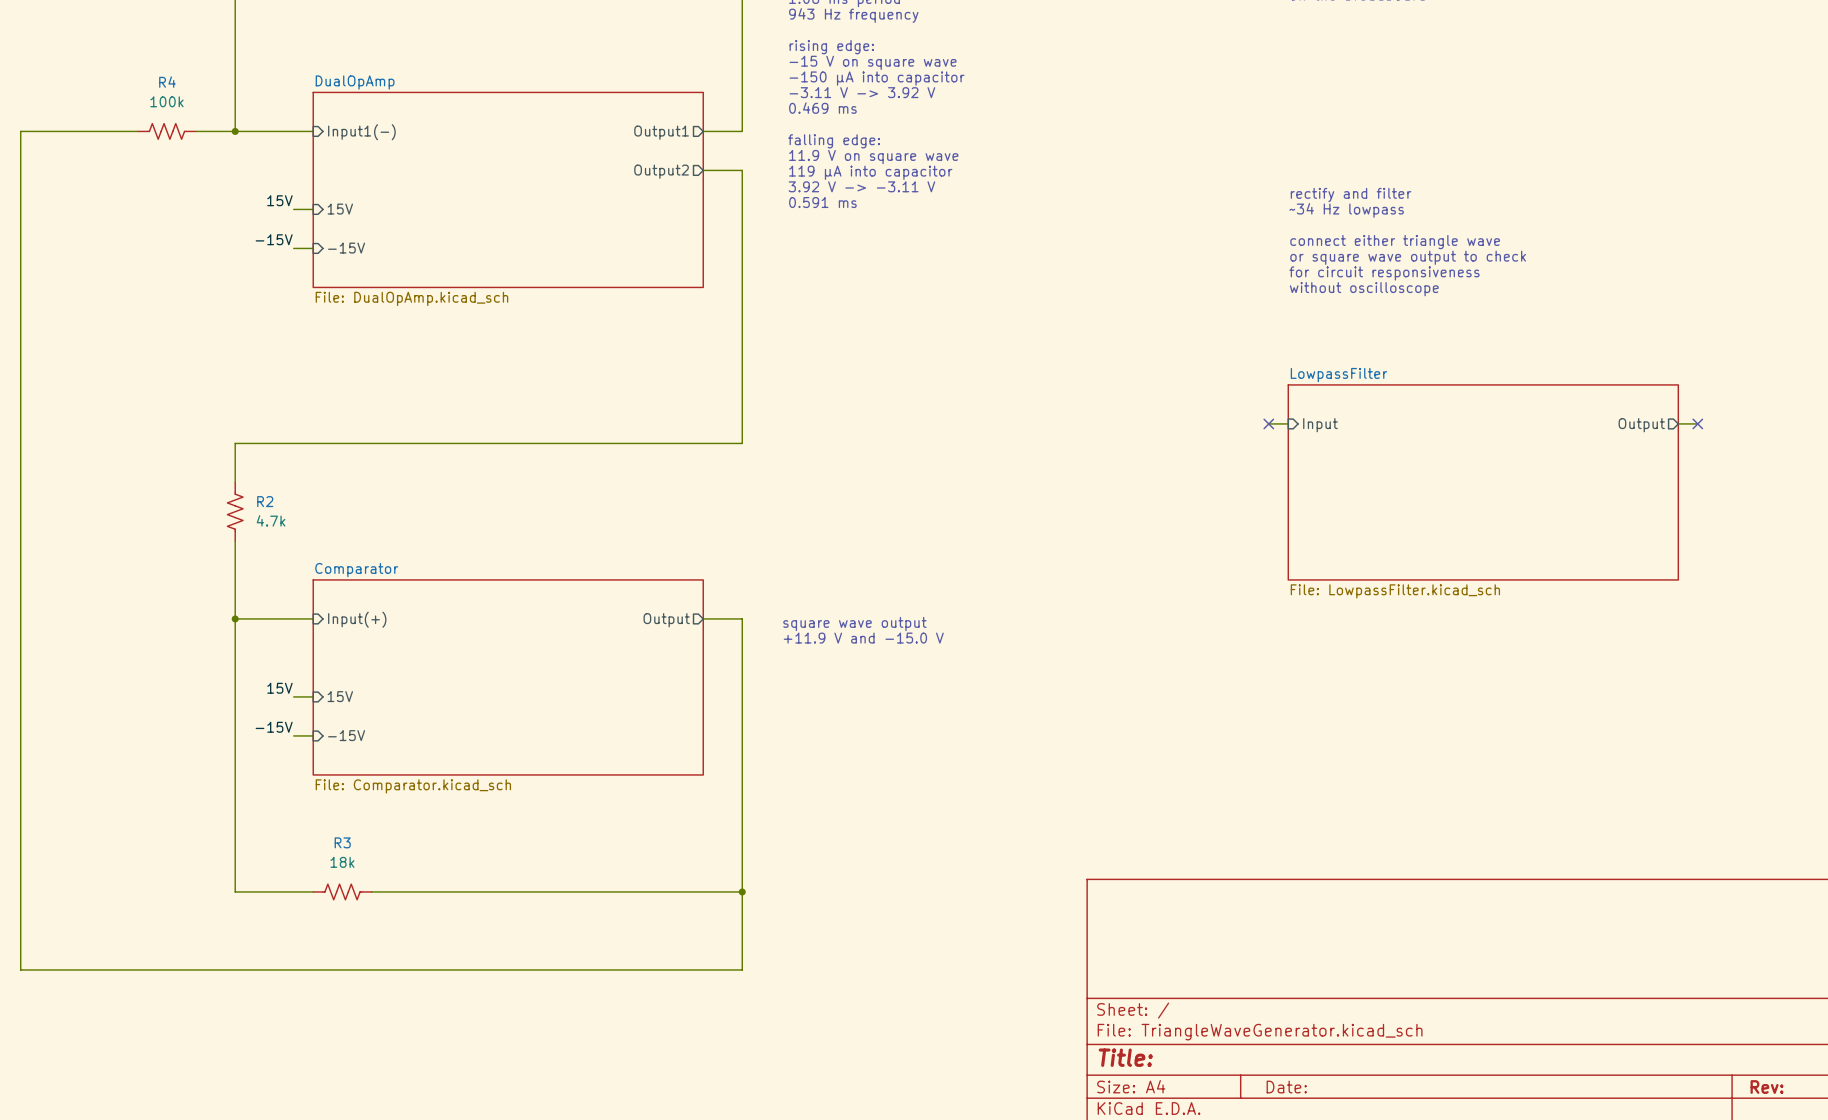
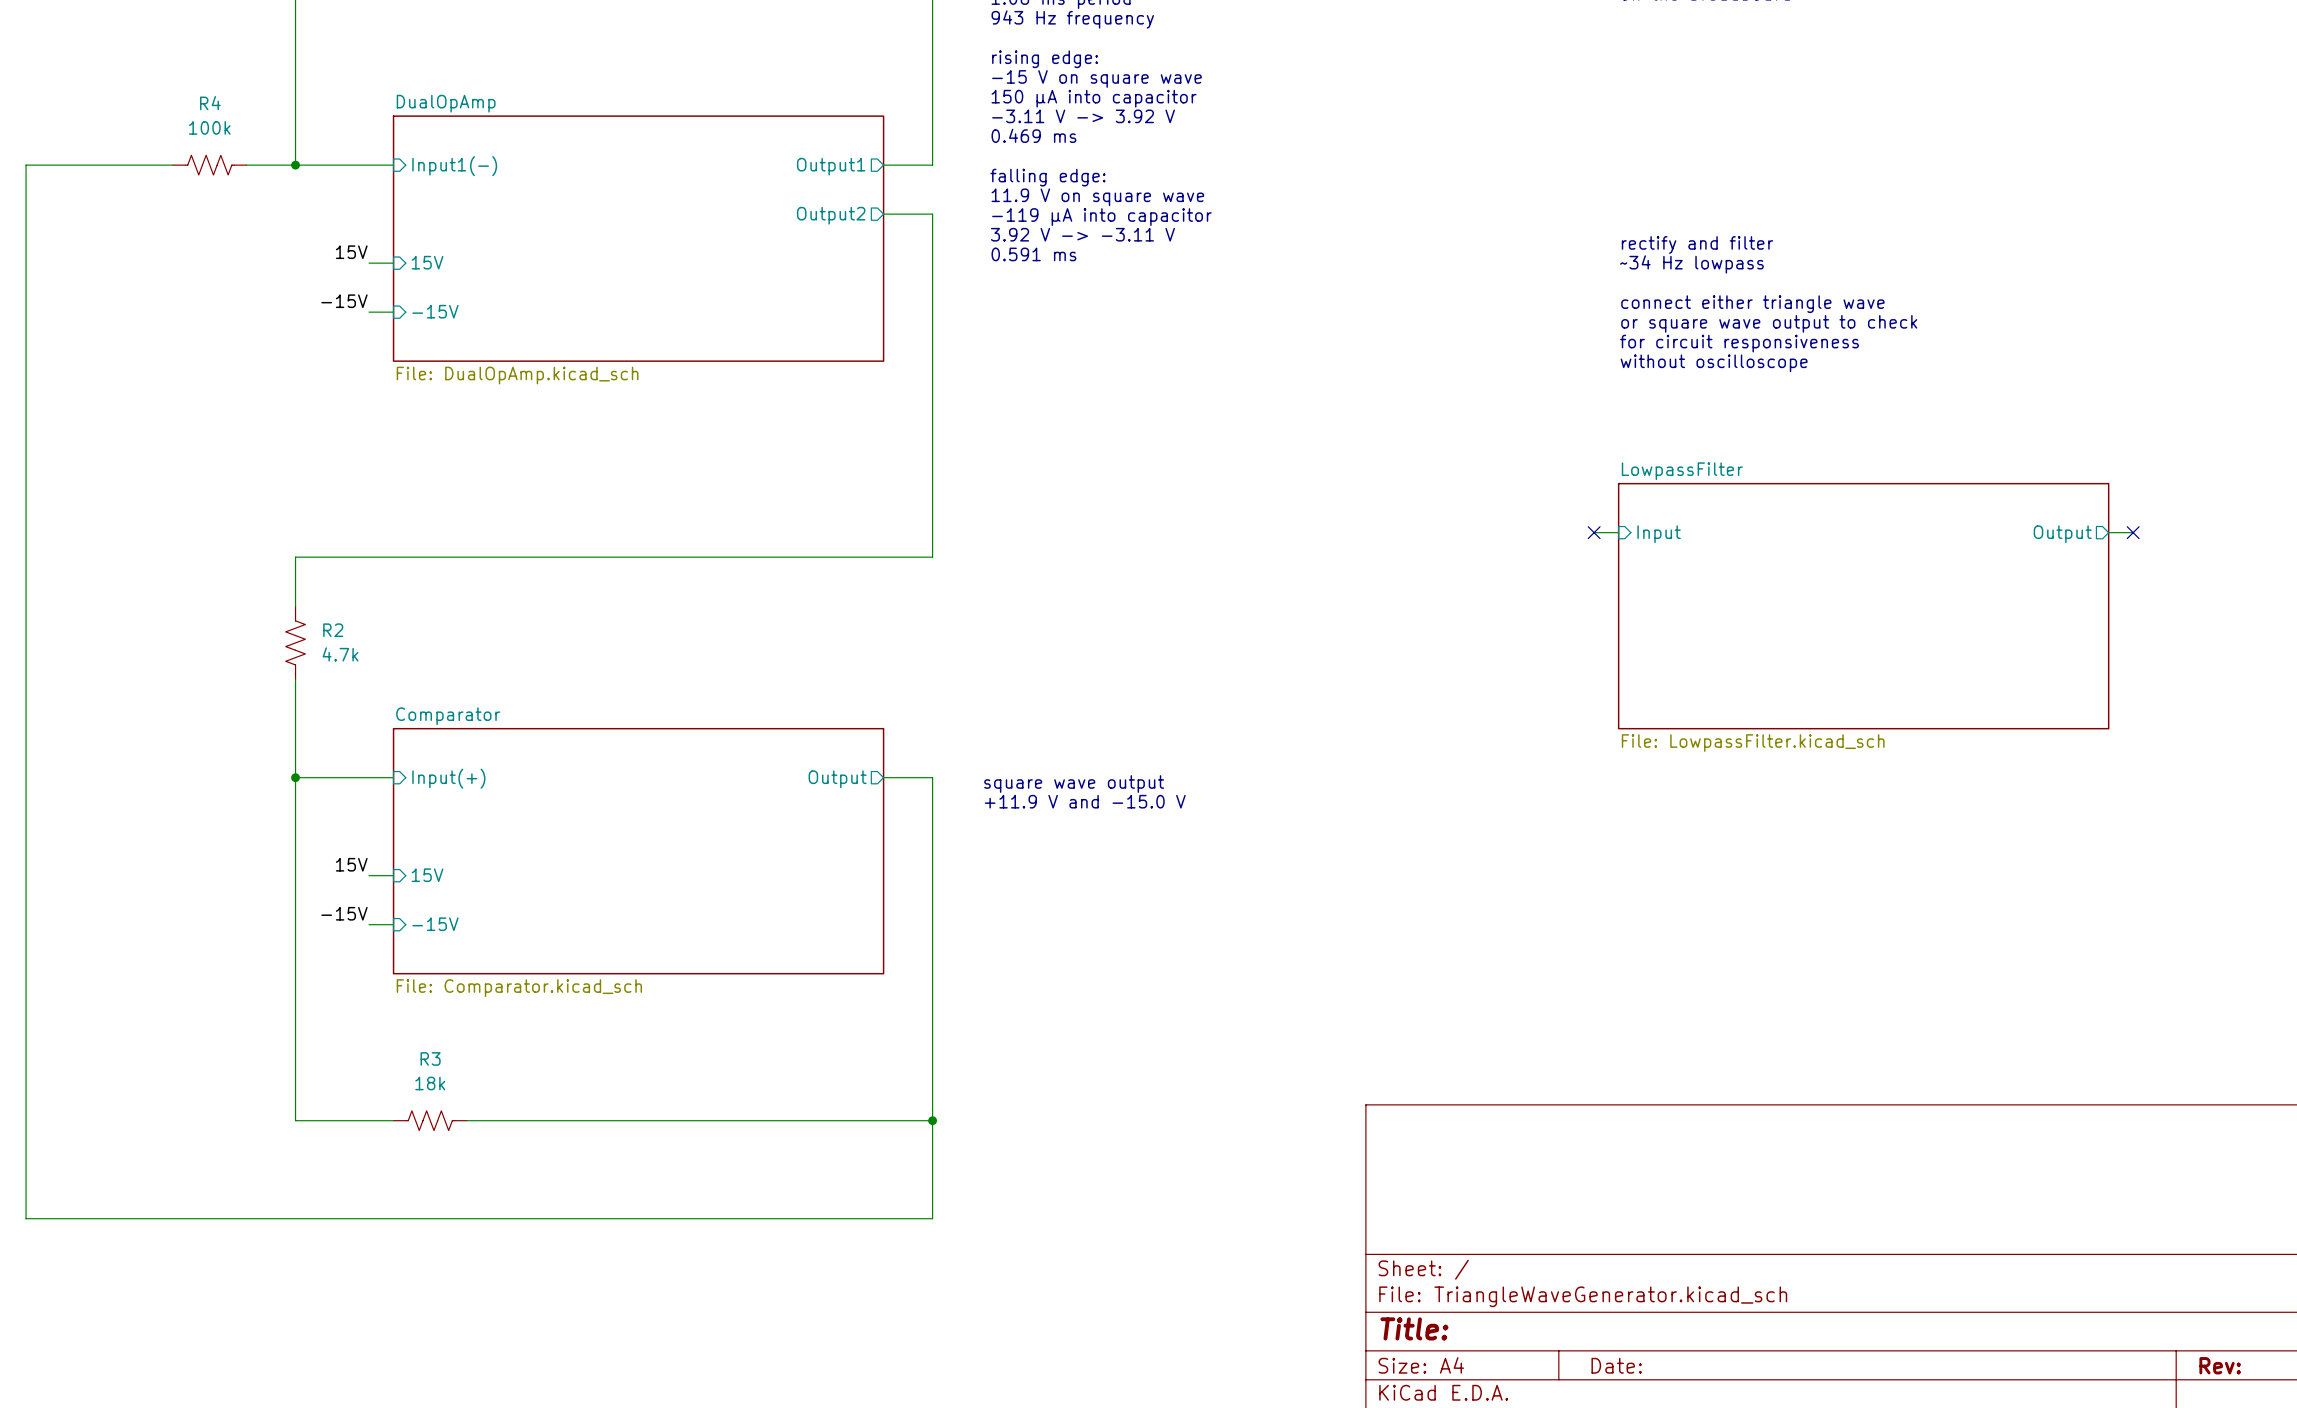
text: -150 μA into capacitor (877, 78) -> 150 μA into capacitor (1094, 98)
text: 119 μA into capacitor (870, 172) -> -119 μA into capacitor (1101, 217)

